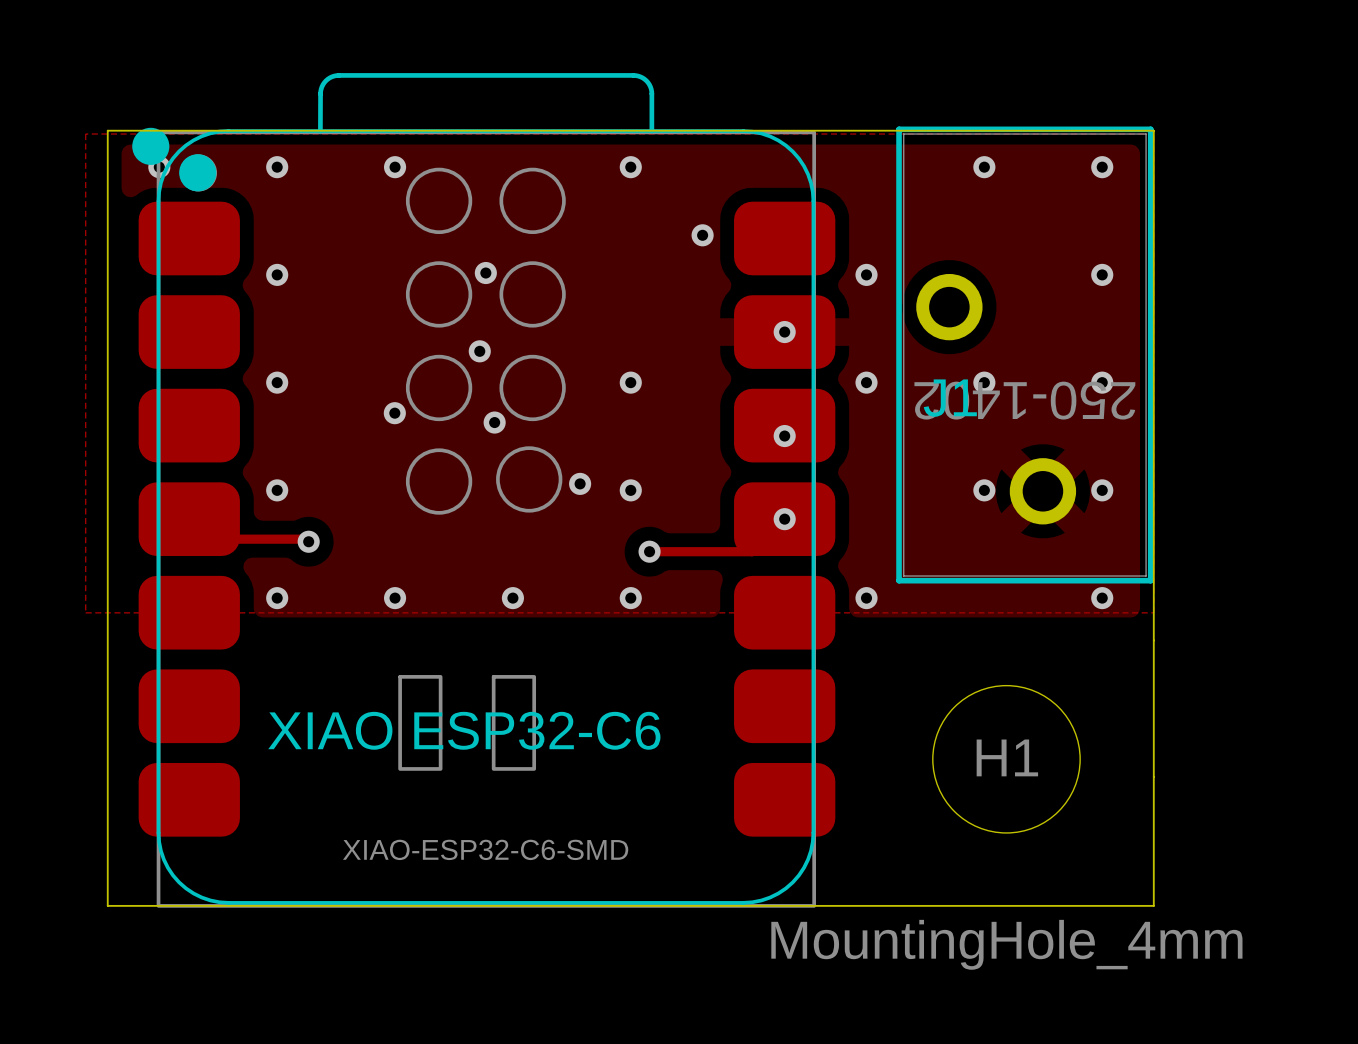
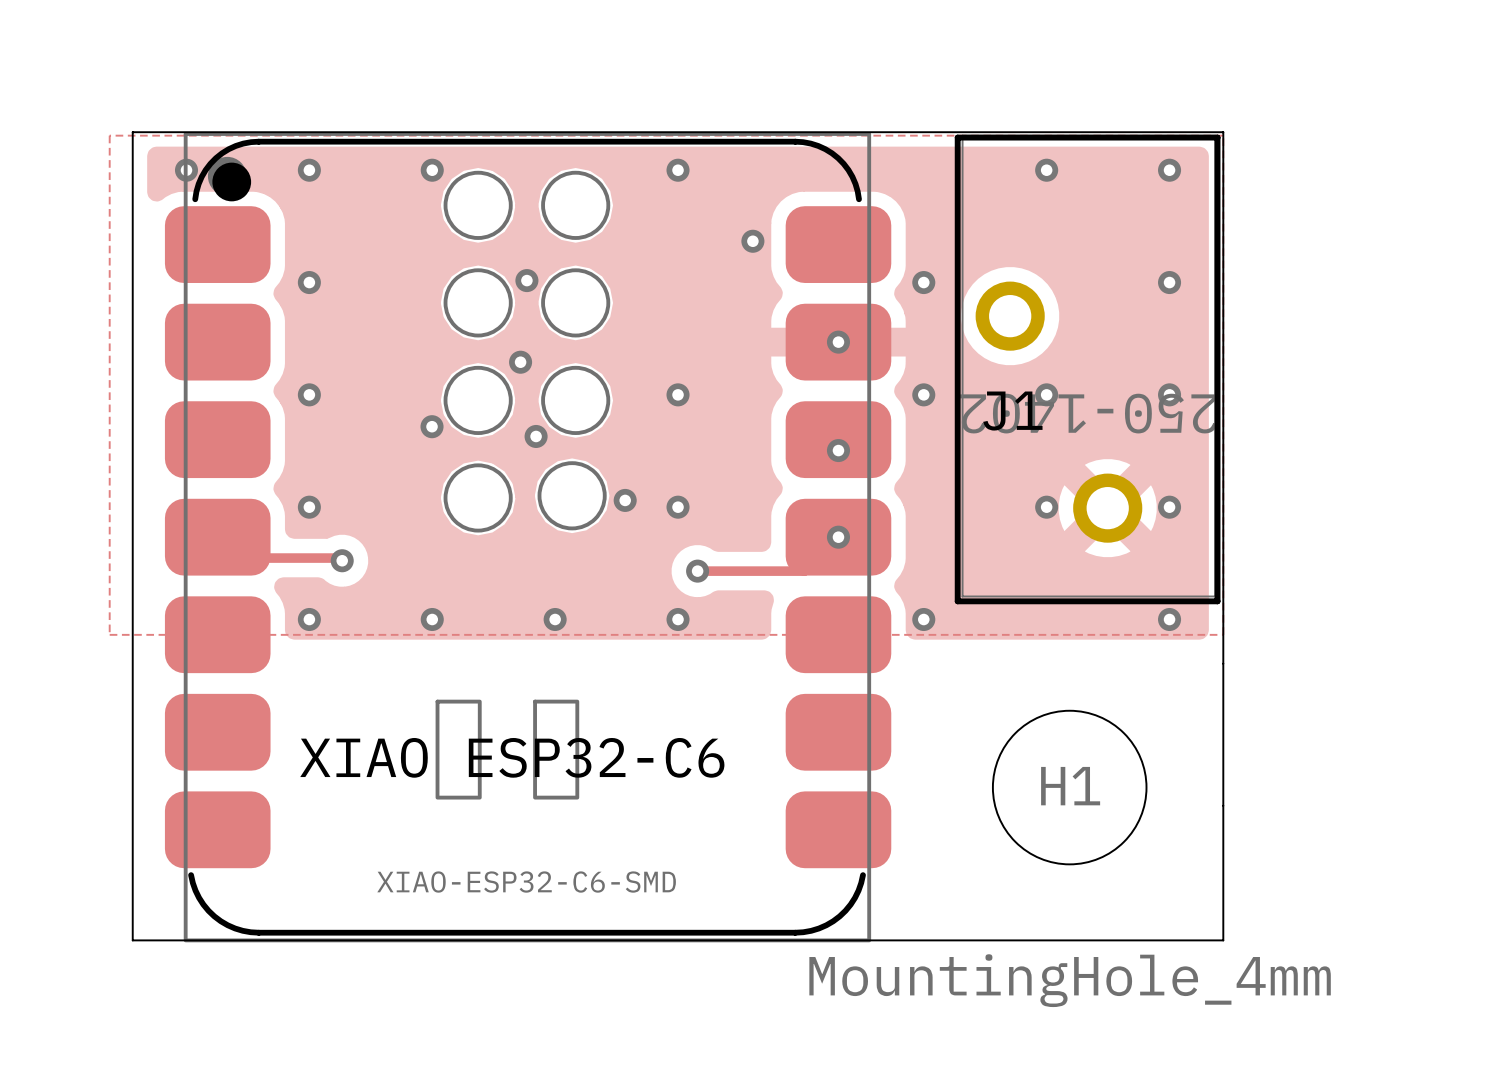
part footprint: [132, 73, 836, 908] -> [164, 132, 892, 943]
J1 footprint: [896, 126, 1154, 584] -> [954, 134, 1221, 605]

